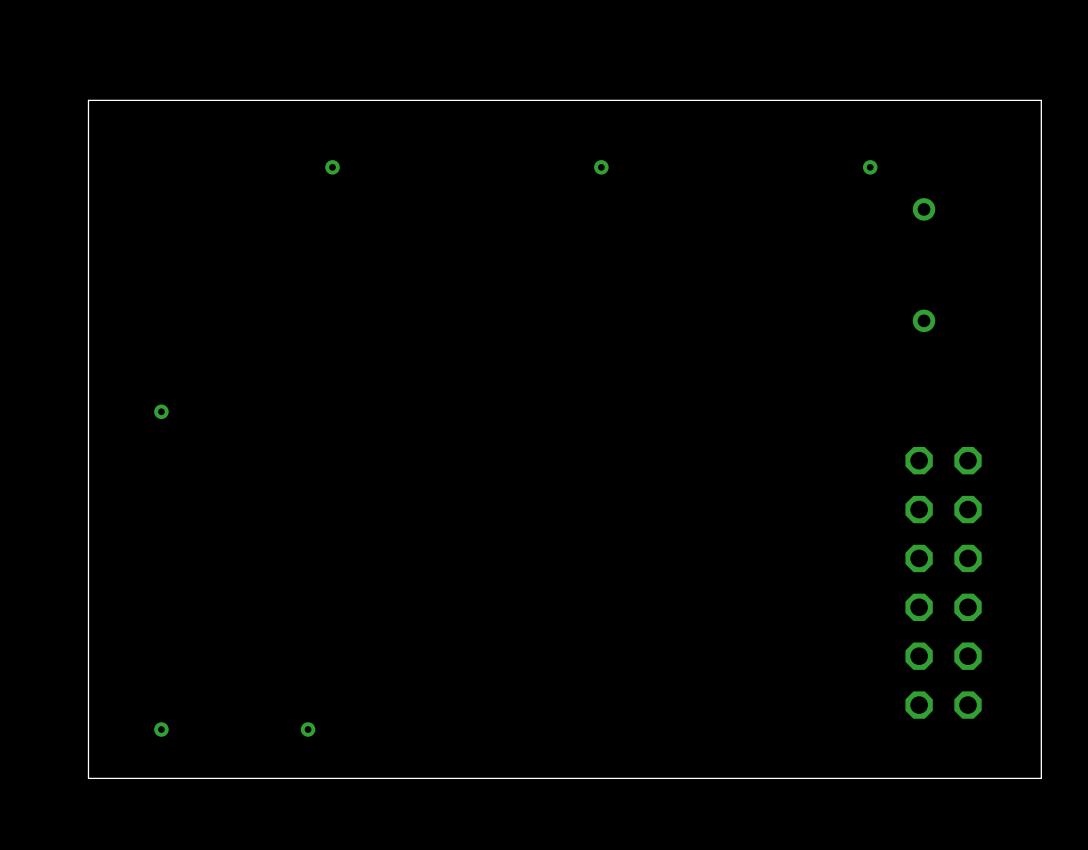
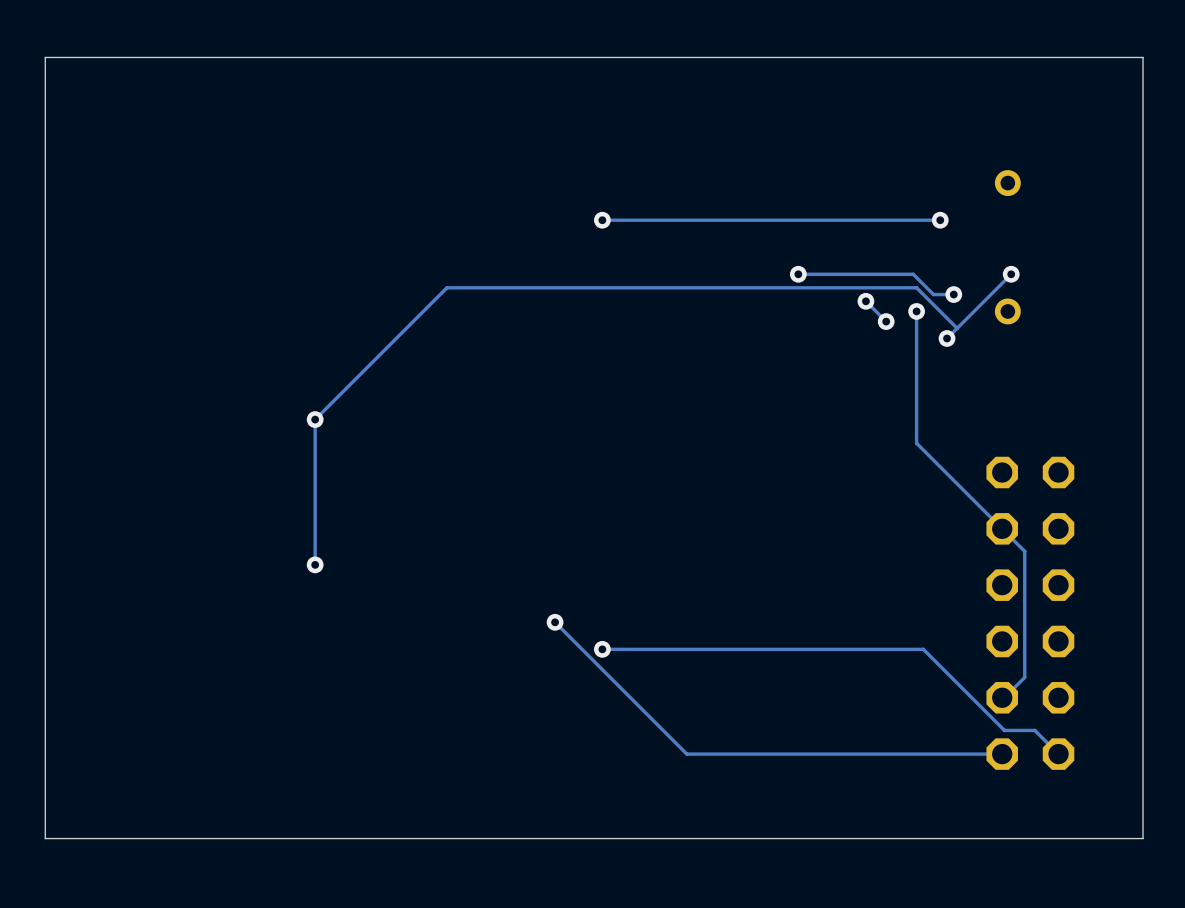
via: (332, 167) -> none
via position: (601, 167) -> (602, 220)
via: (870, 167) -> none
track: none -> (940, 220) (602, 220)
via: none -> (940, 220)
track: none -> (798, 274) (913, 274) (933, 294) (953, 294)
via: none -> (798, 274)
track: none -> (1011, 274) (947, 338)
via: none -> (1011, 274)
via: none -> (953, 294)
track: none -> (865, 301) (886, 321)
via: none -> (865, 301)
track: none -> (916, 311) (916, 443) (1024, 551) (1024, 677) (1004, 697) (1002, 697)
via: none -> (916, 311)
via: none -> (886, 321)
track: none -> (957, 328) (916, 287) (446, 287) (315, 419) (315, 564)
via: none -> (947, 338)
via: (161, 411) -> none
via: none -> (315, 419)
via: none -> (315, 564)
track: none -> (555, 622) (686, 754) (1002, 754)
via: none -> (555, 622)
track: none -> (602, 649) (923, 649) (1004, 730) (1034, 730) (1058, 754)
via: none -> (602, 649)
via: (161, 729) -> none
via: (308, 729) -> none

